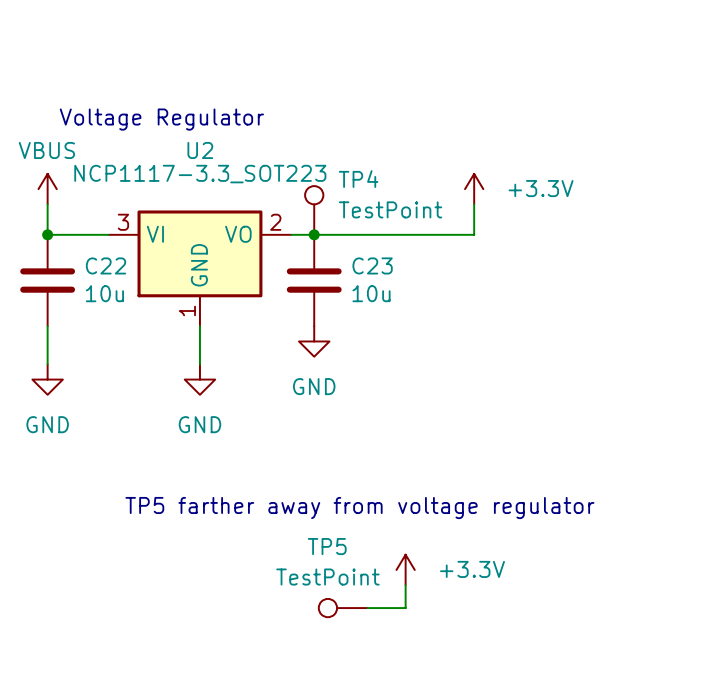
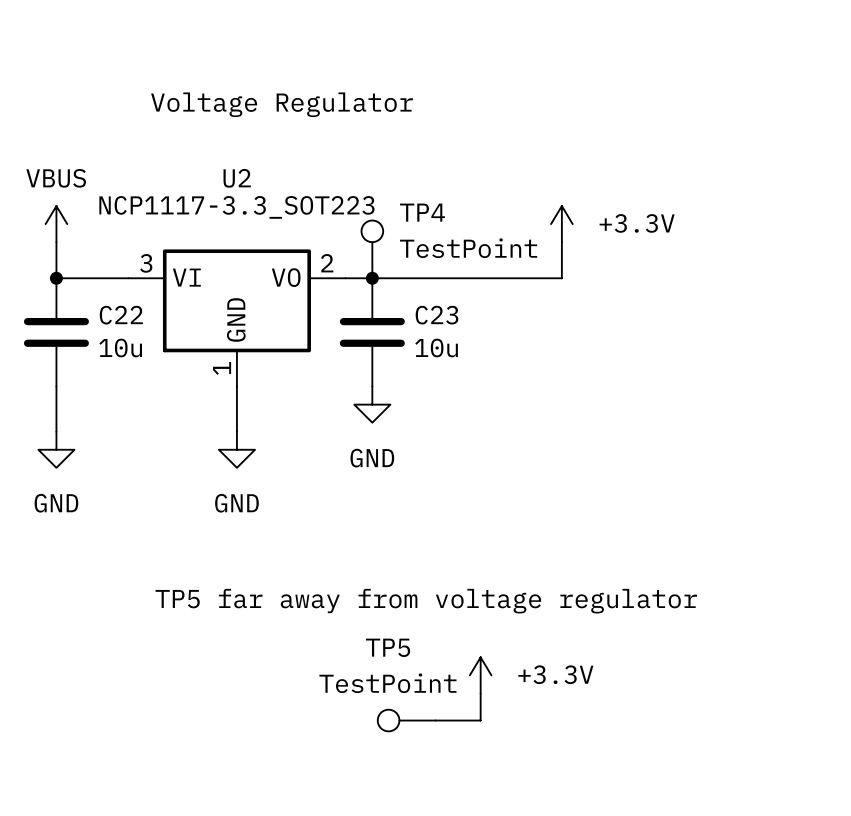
text position: Voltage Regulator (161, 119) -> Voltage Regulator (282, 104)
text: TP5 farther away from voltage regulator (359, 508) -> TP5 far away from voltage regulator (426, 601)

